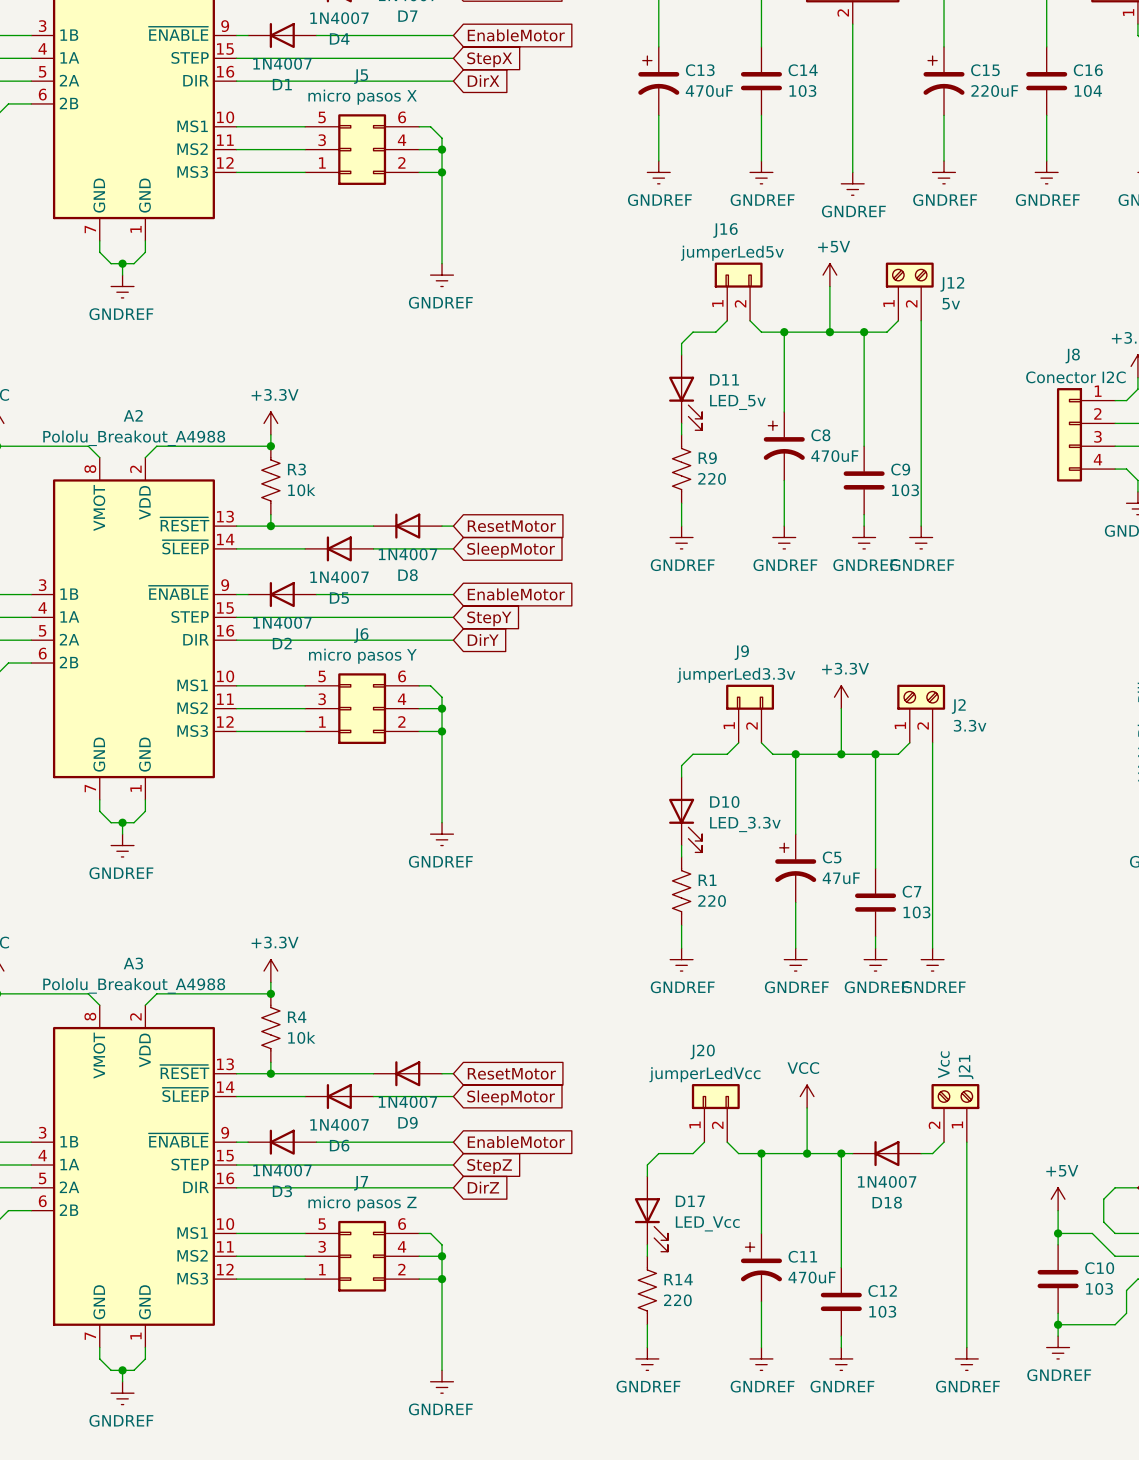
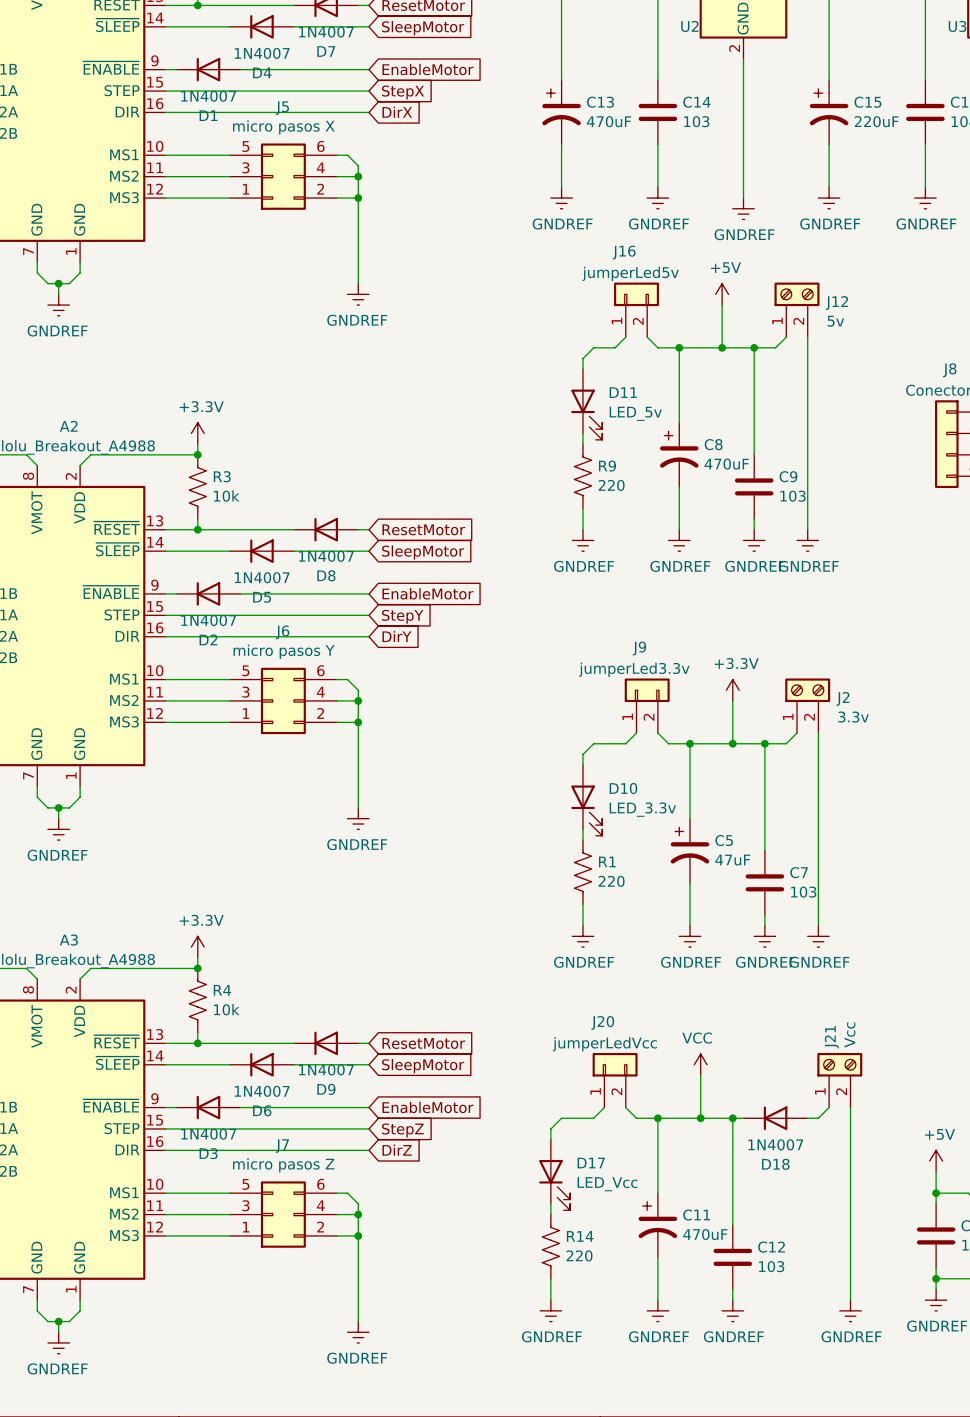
J21 flip: as is (955, 1096) -> left-right (839, 1064)

